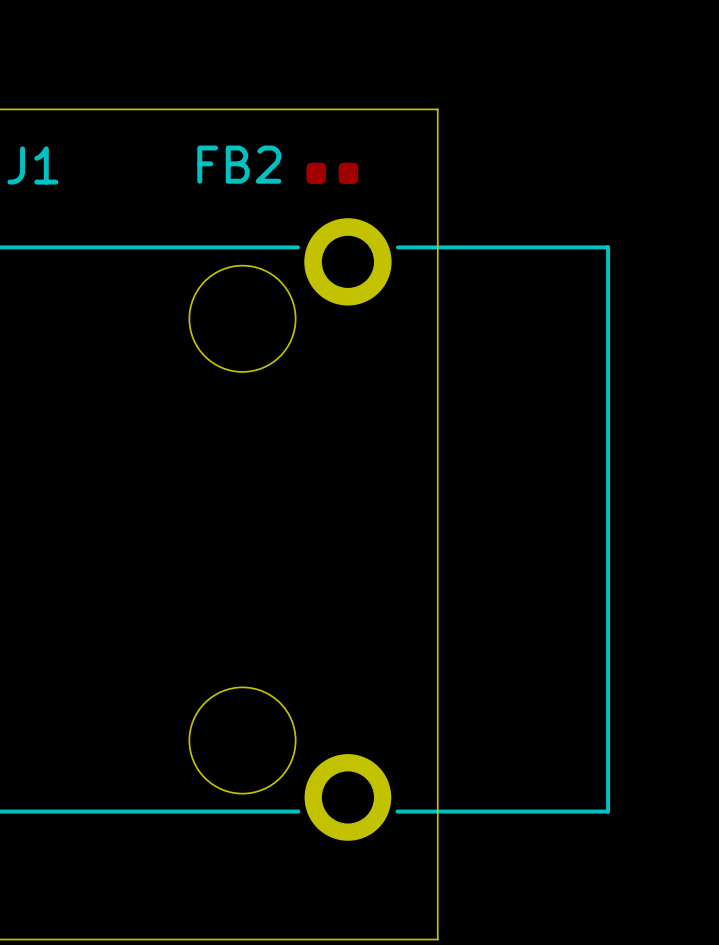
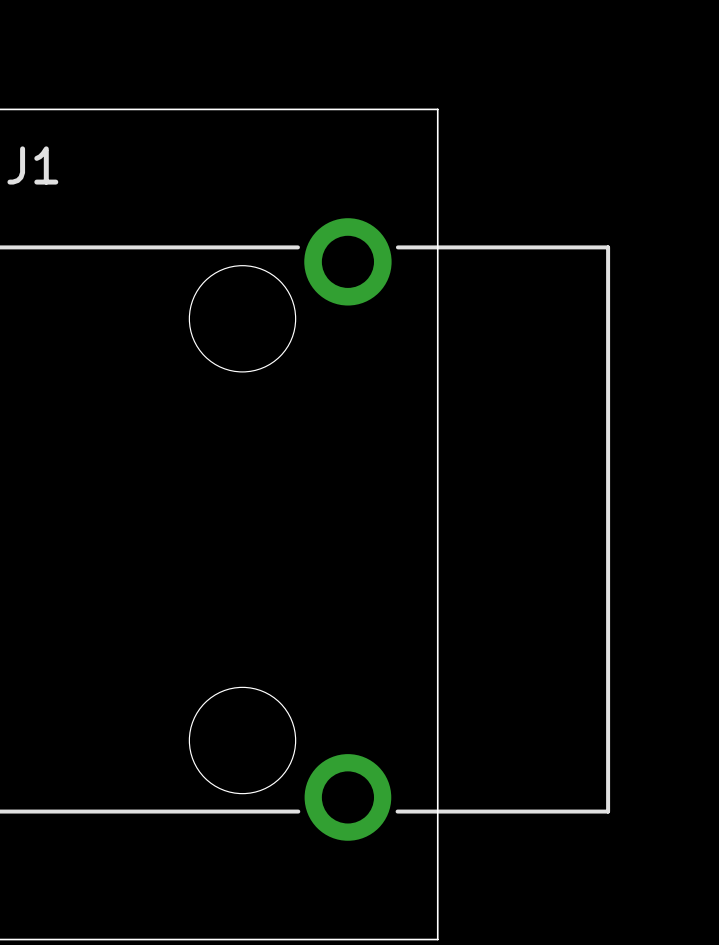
FB2: (332, 173) -> none

